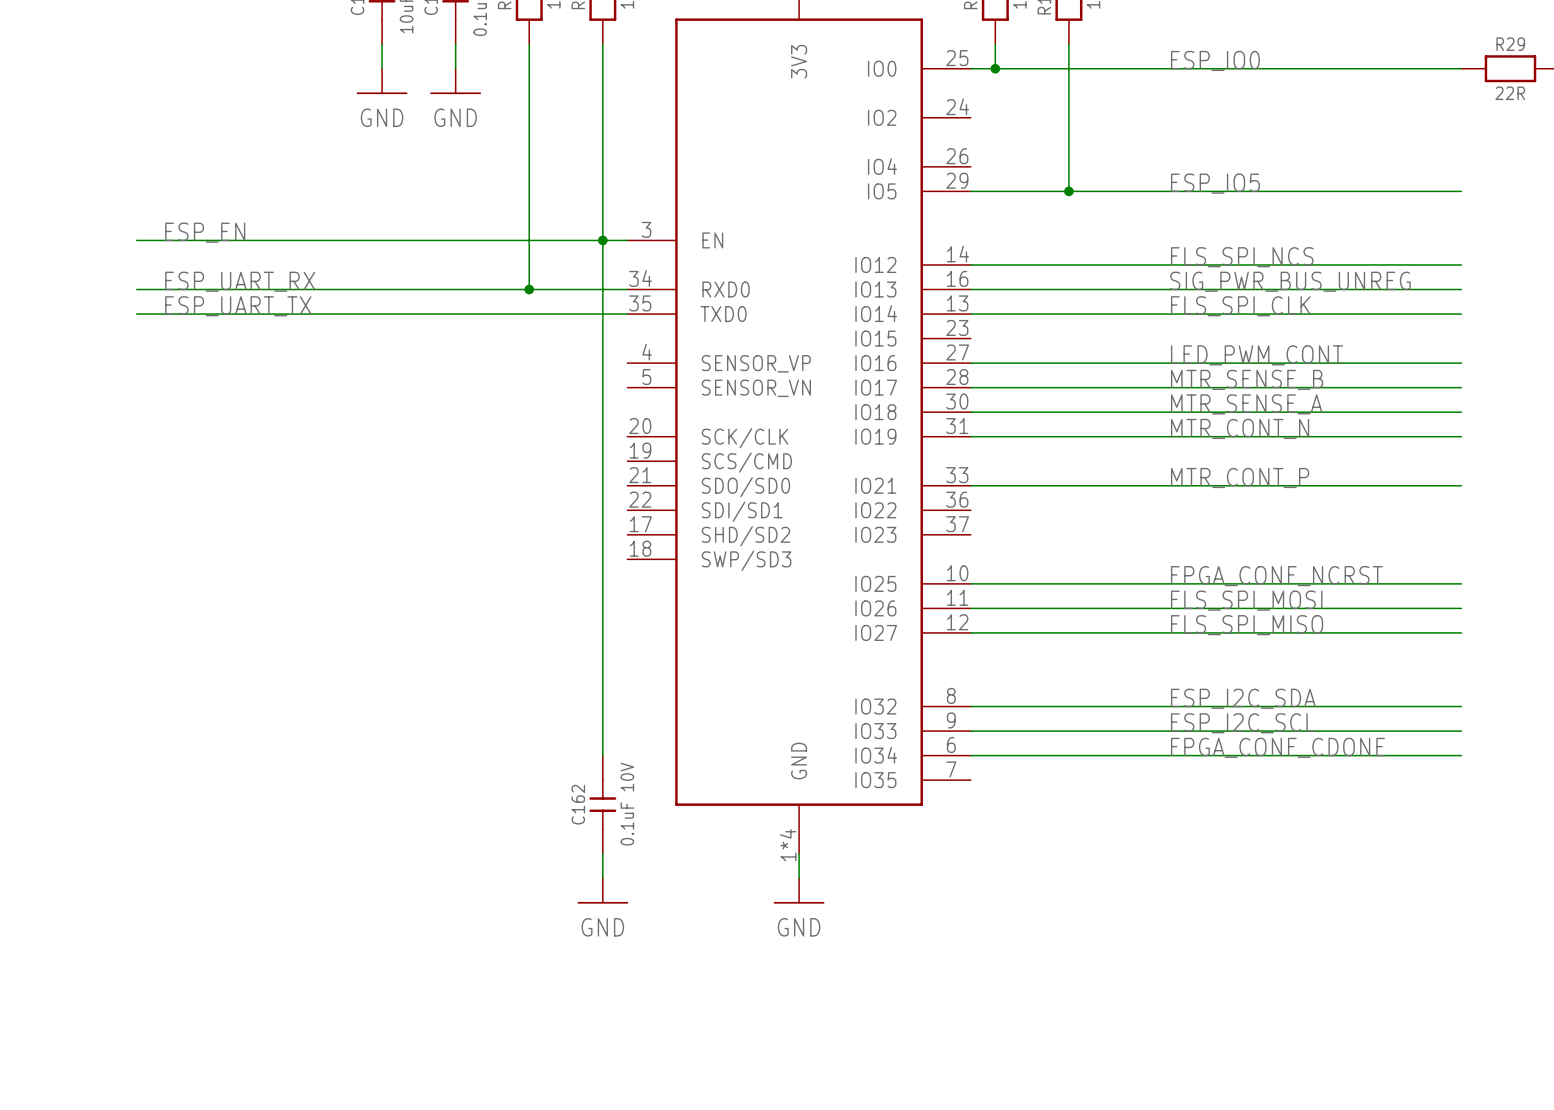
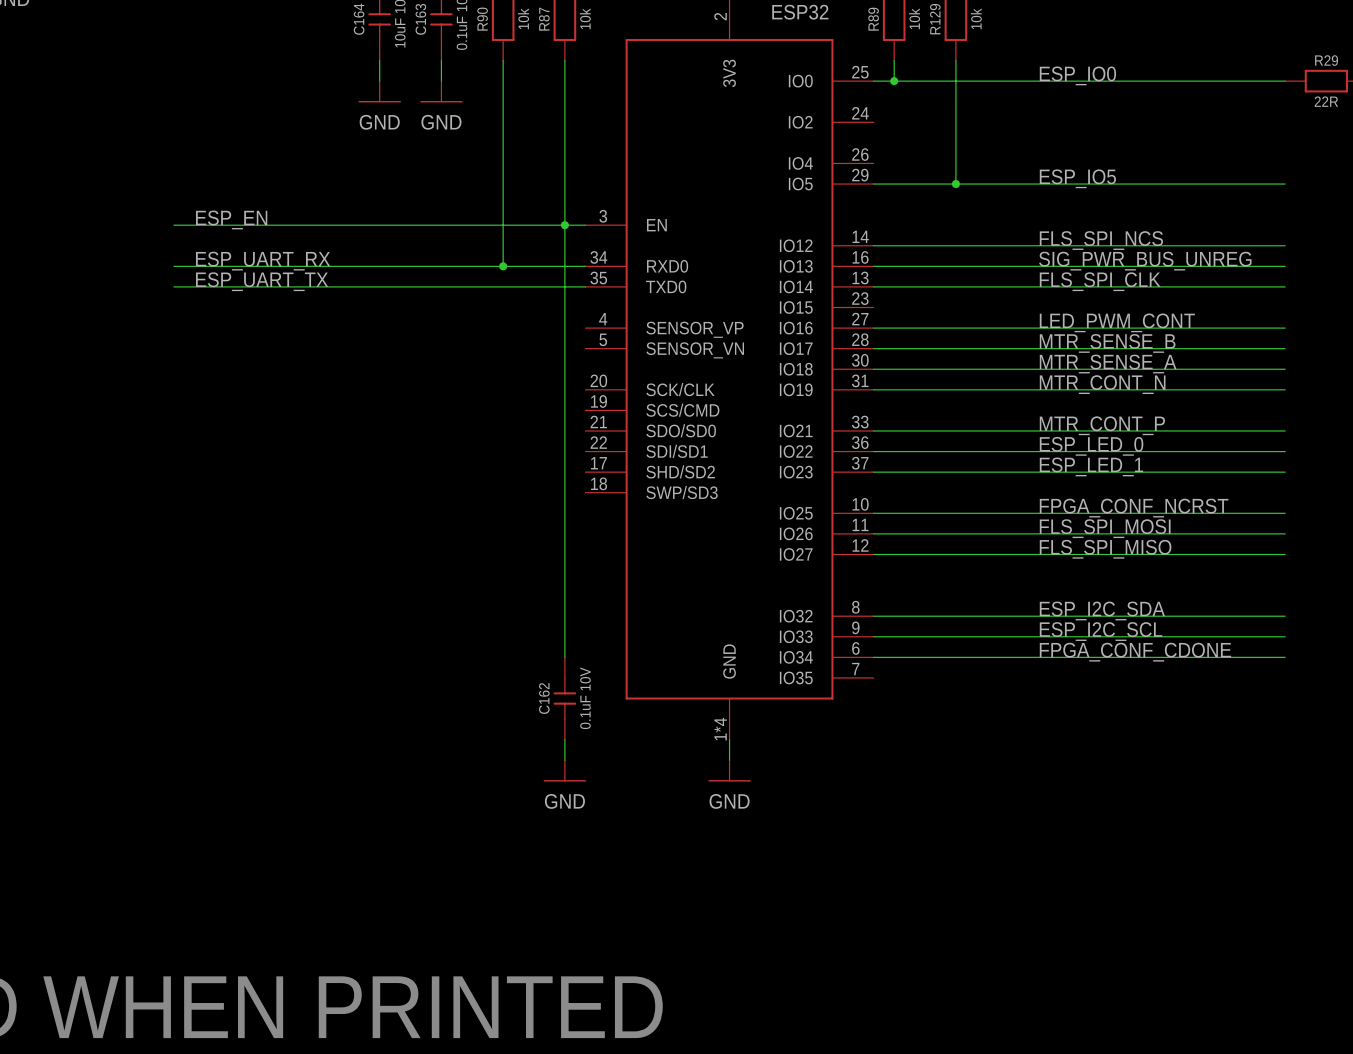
label: none -> ESP_LED_0 (1091, 446)
wire: none -> (873, 451) (1285, 451)
label: none -> ESP_LED_1 (1091, 466)
wire: none -> (873, 472) (1285, 472)

